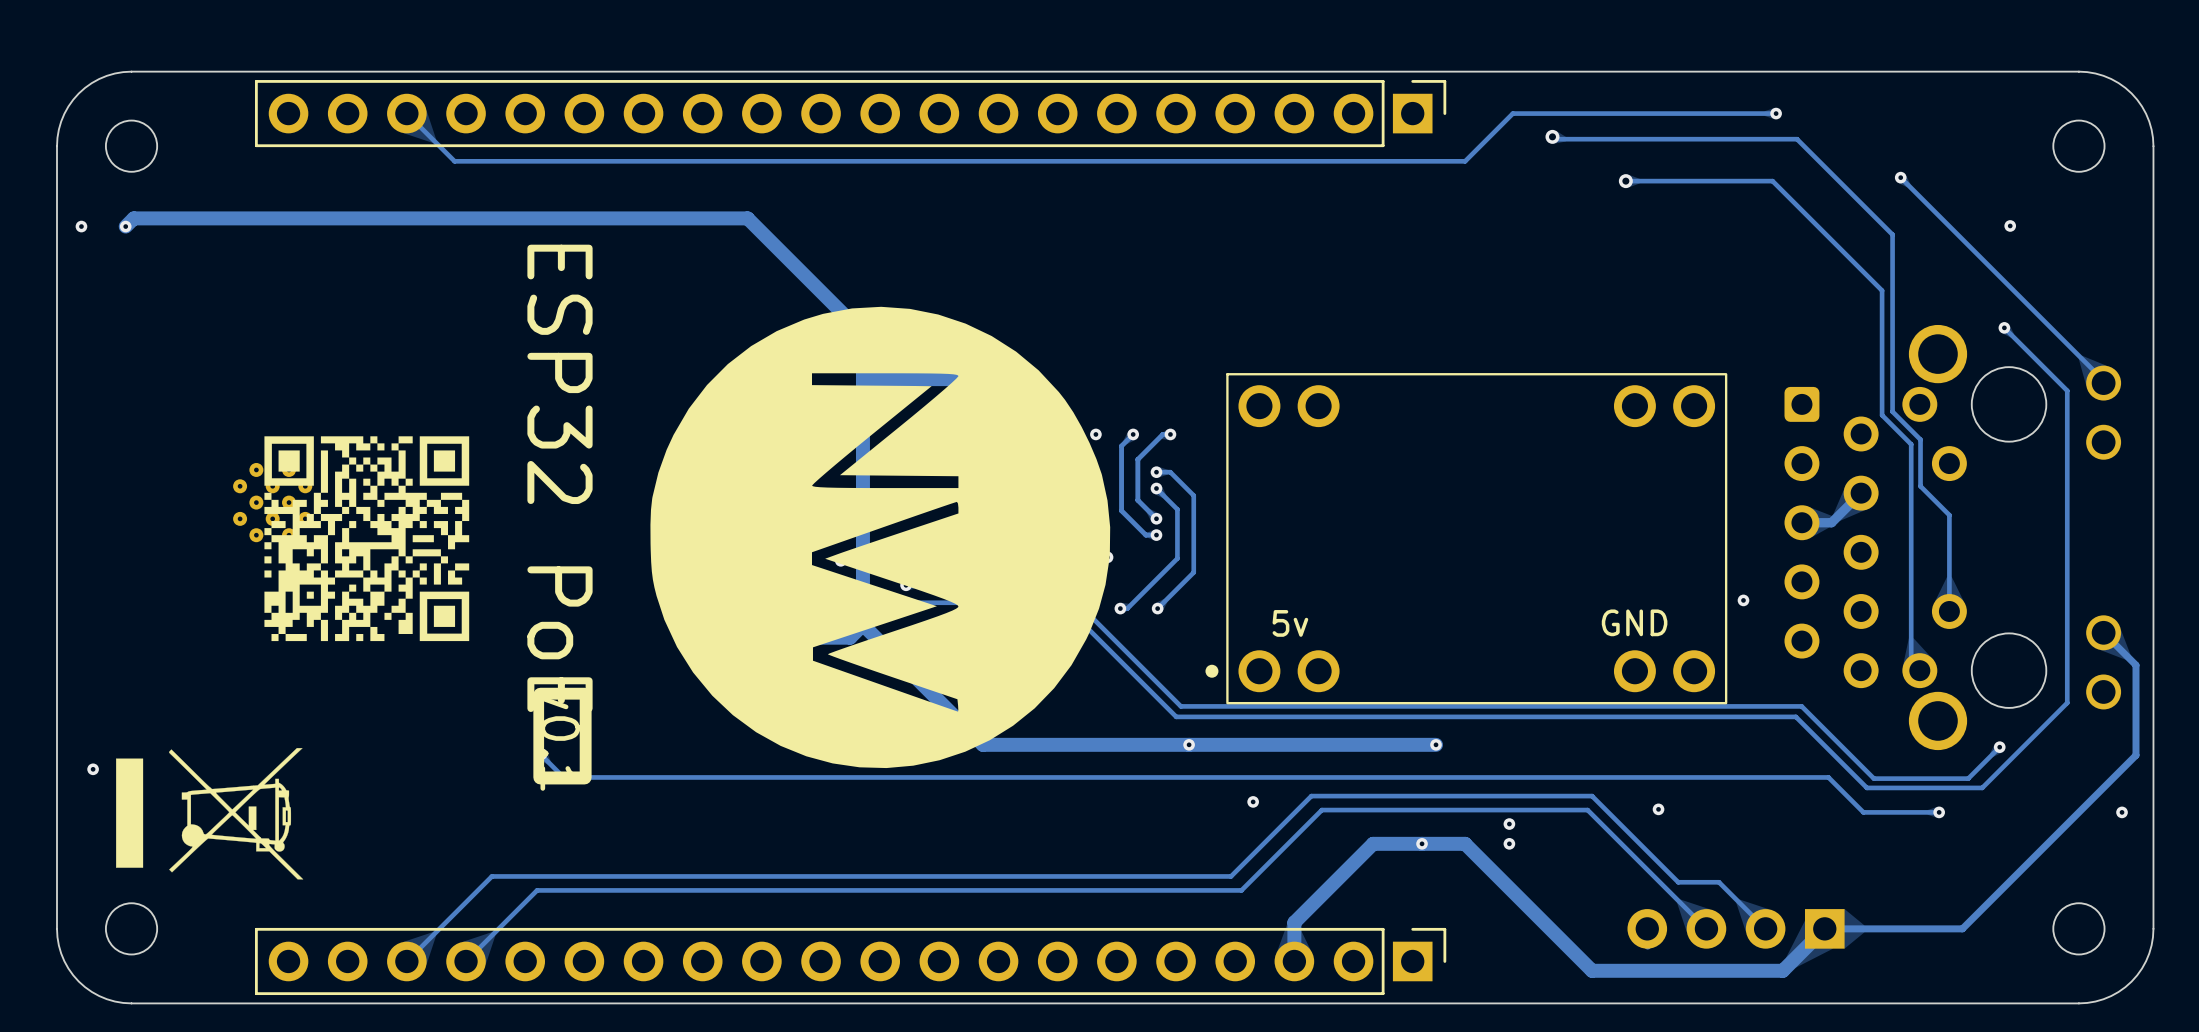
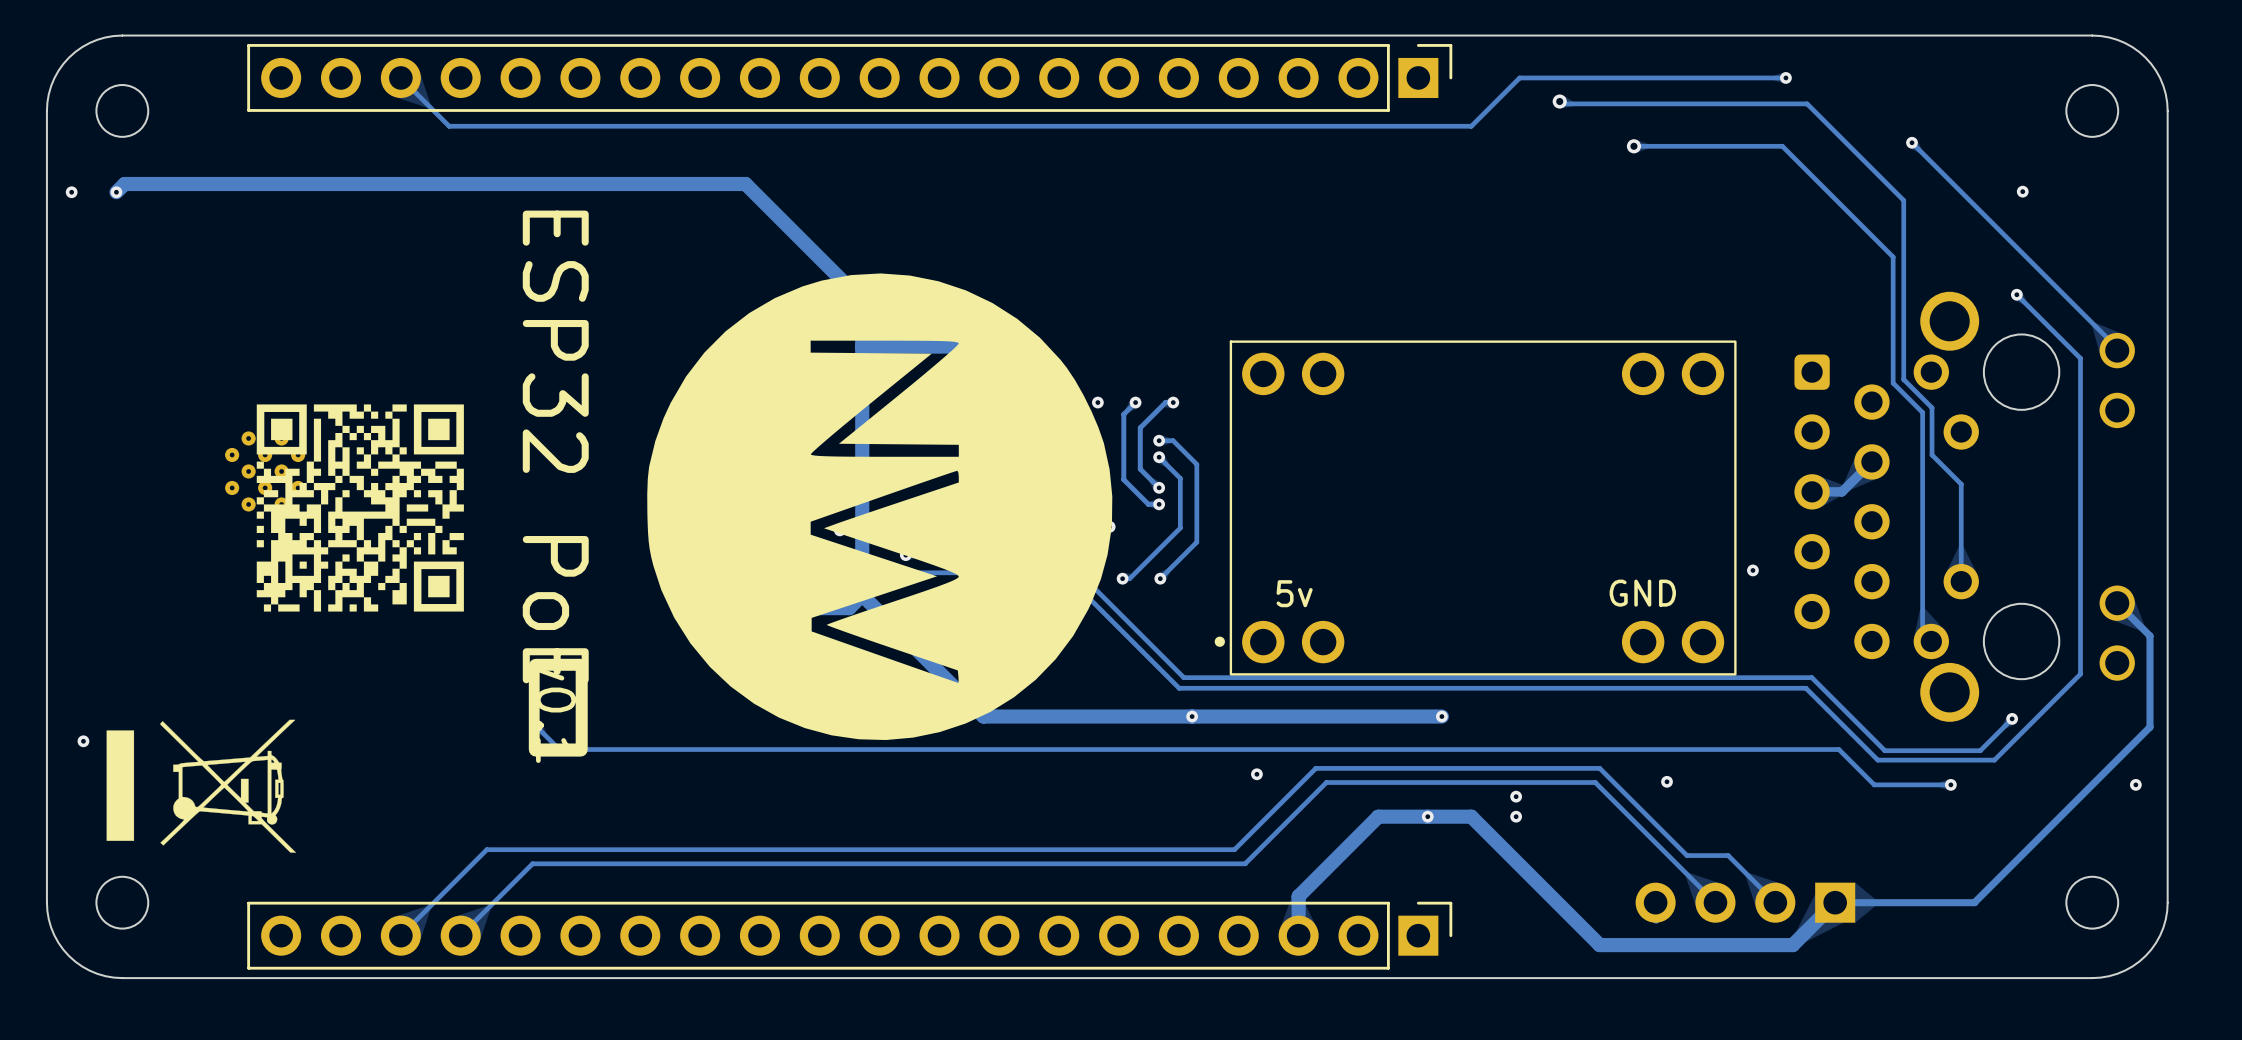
part footprint: [1205, 373, 1728, 705] -> [1229, 340, 1737, 676]
drawing: none -> [1214, 636, 1225, 647]

